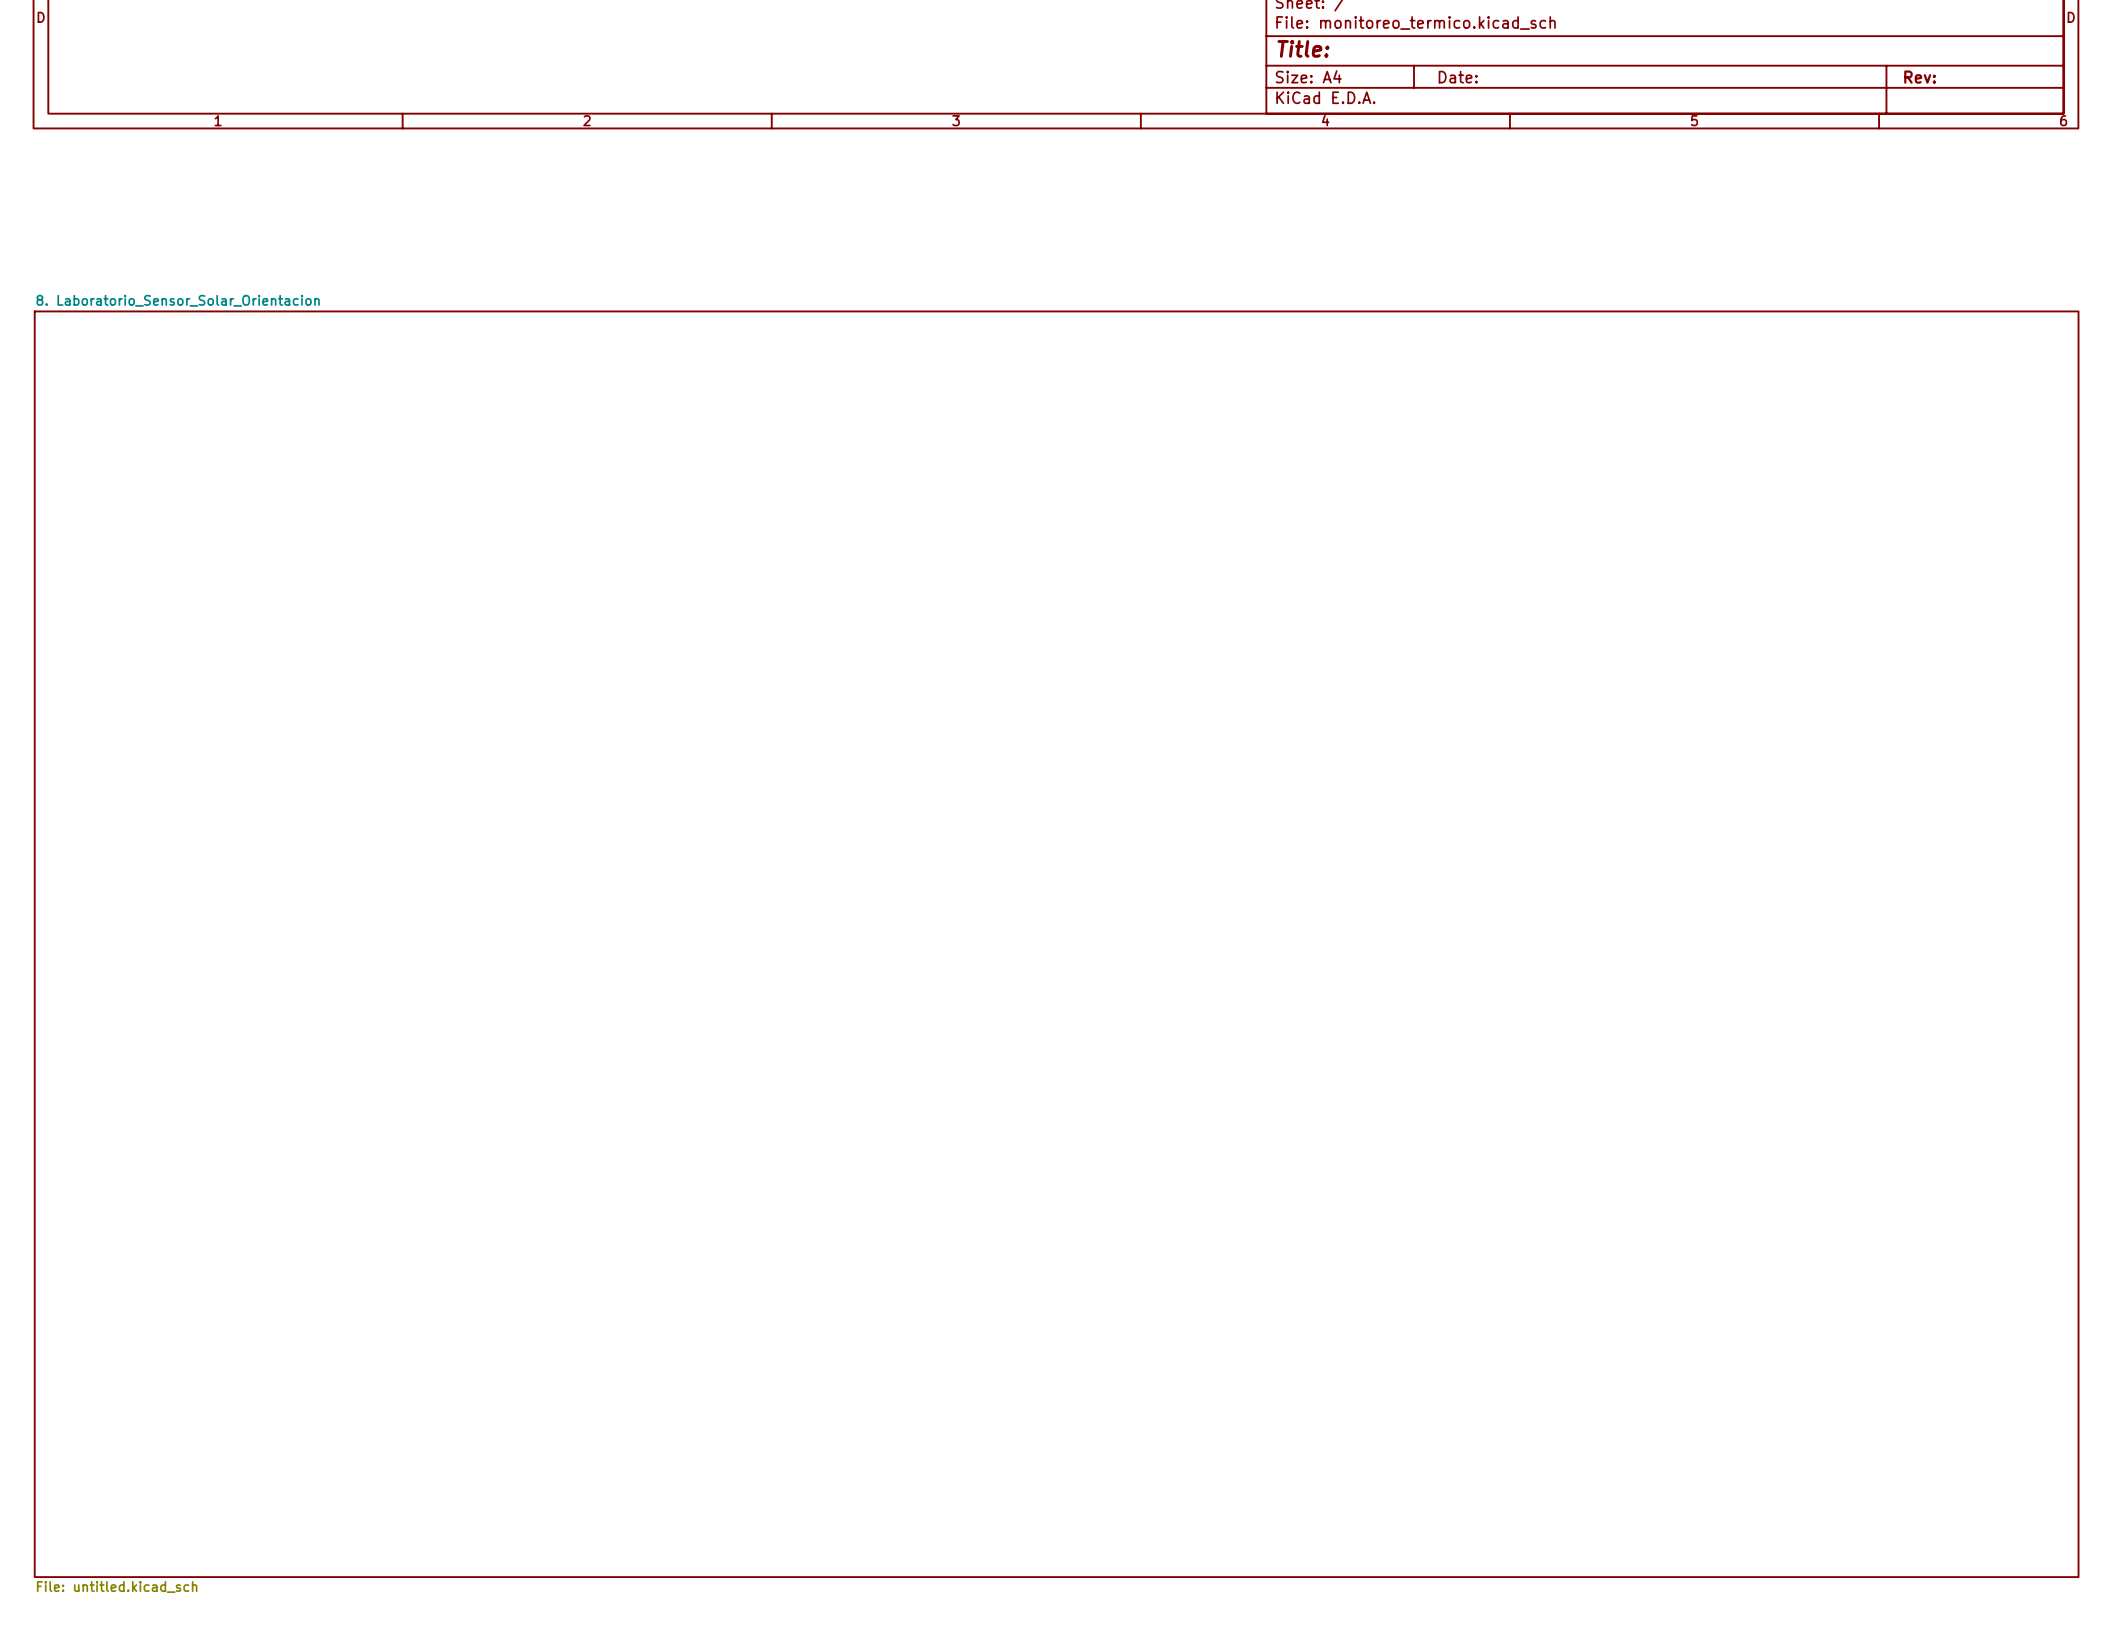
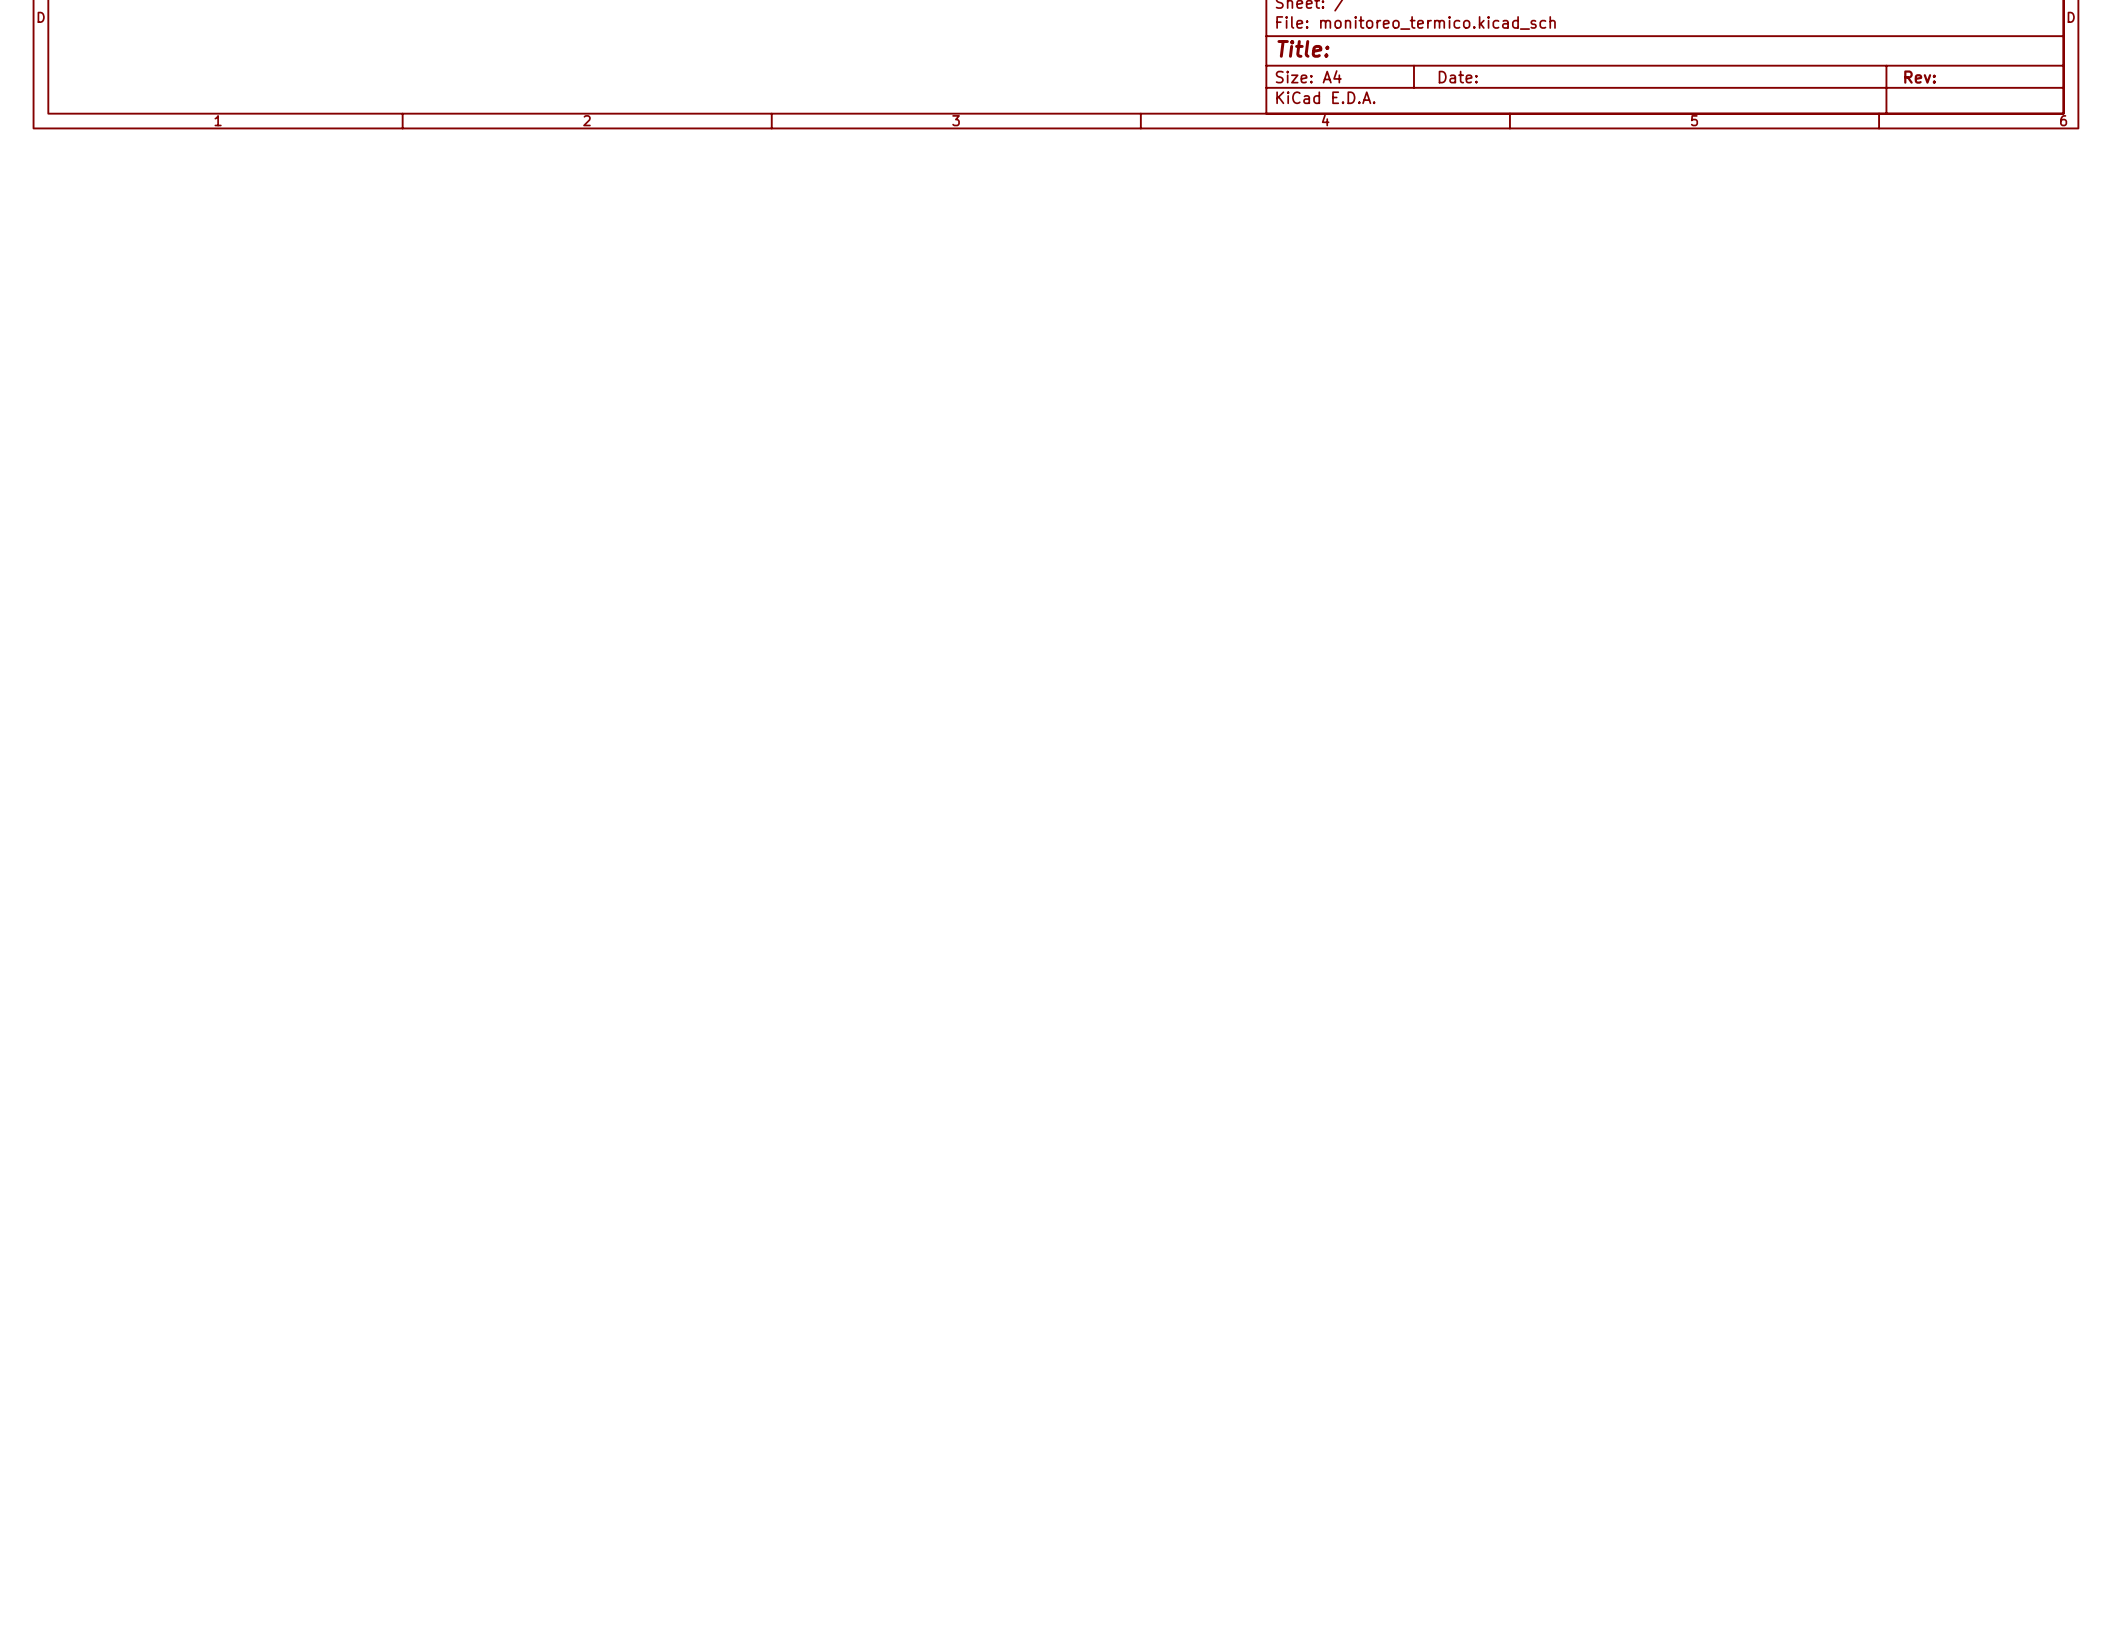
sheet 8. Laboratorio_Sensor_Solar_Orientacion: File: untitled.kicad_sch (1056, 944) -> none

